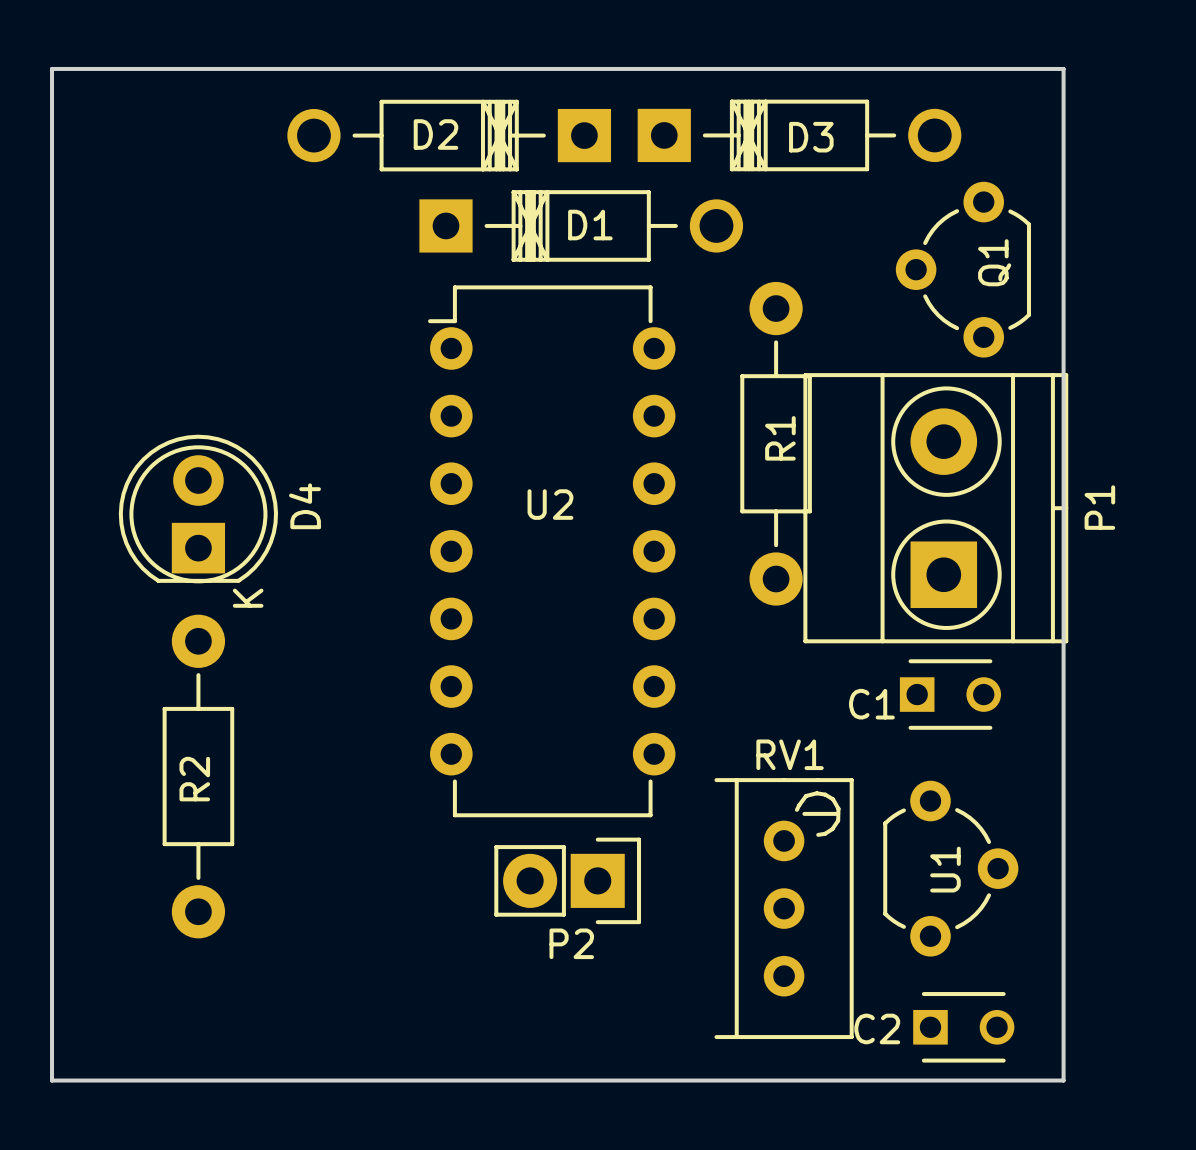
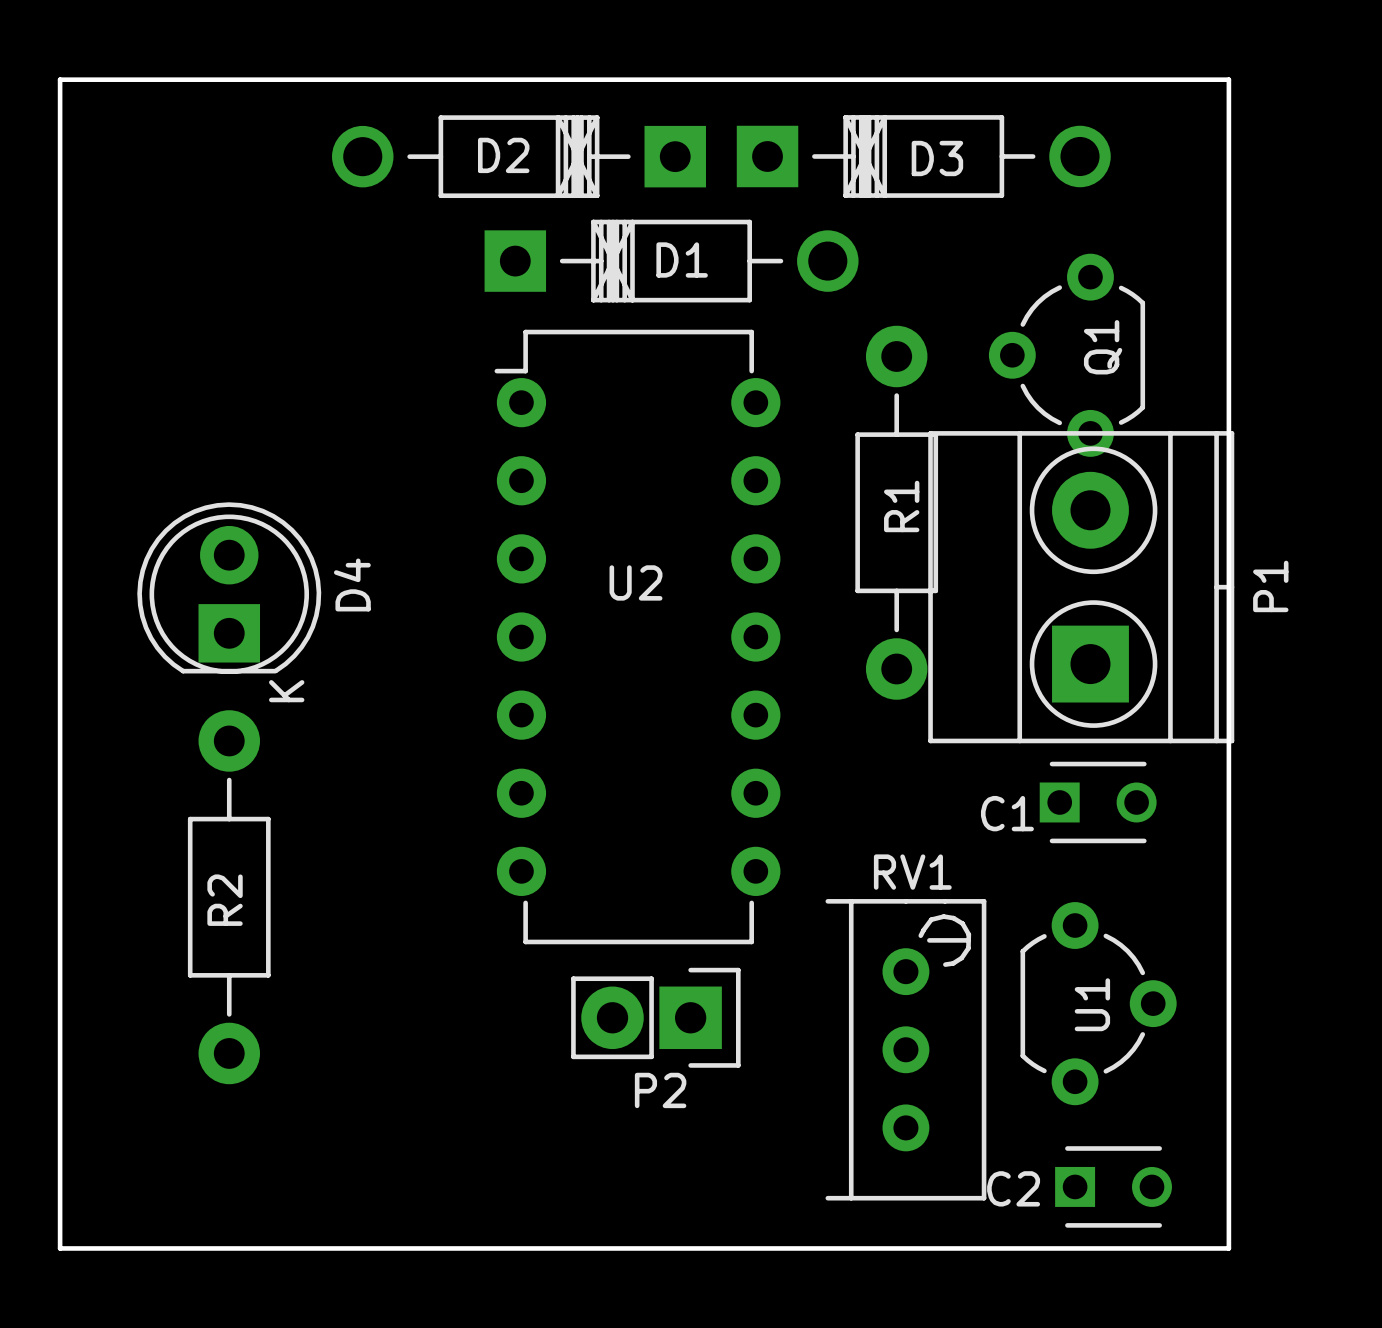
Q1 position: (963, 269) -> (1066, 355)

